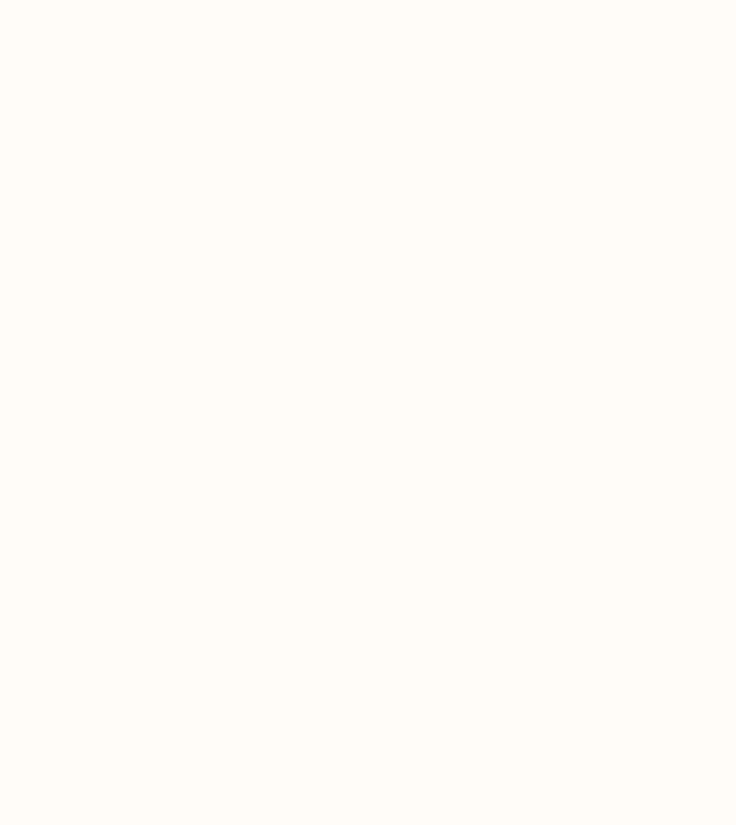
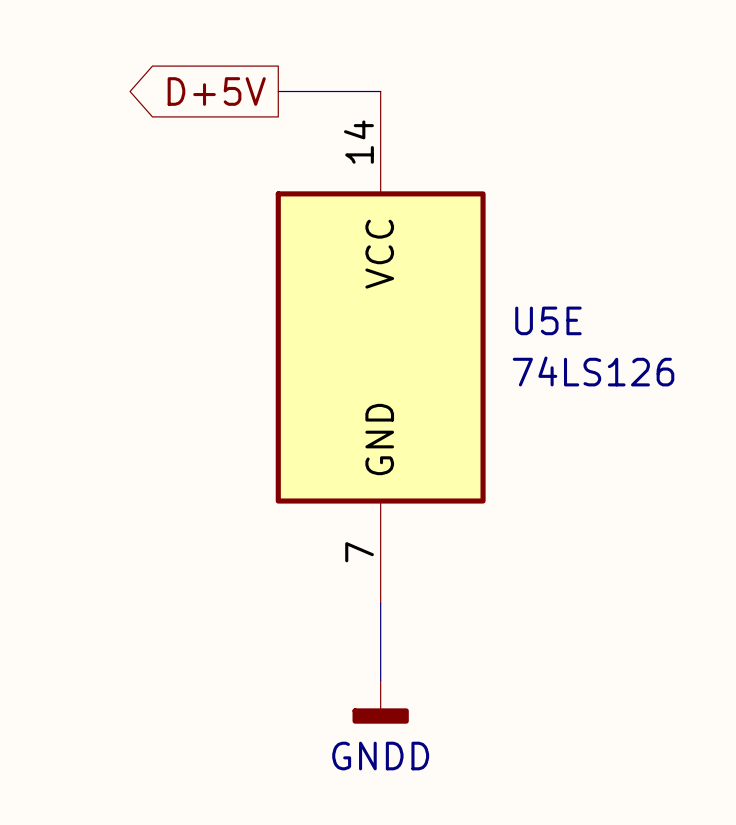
global label: none -> D+5V (216, 91)
wire: none -> (278, 91) (380, 91)
U5E: none -> 74LS126 (380, 347)
wire: none -> (380, 603) (380, 680)
power symbol: none -> GNDD (380, 701)

